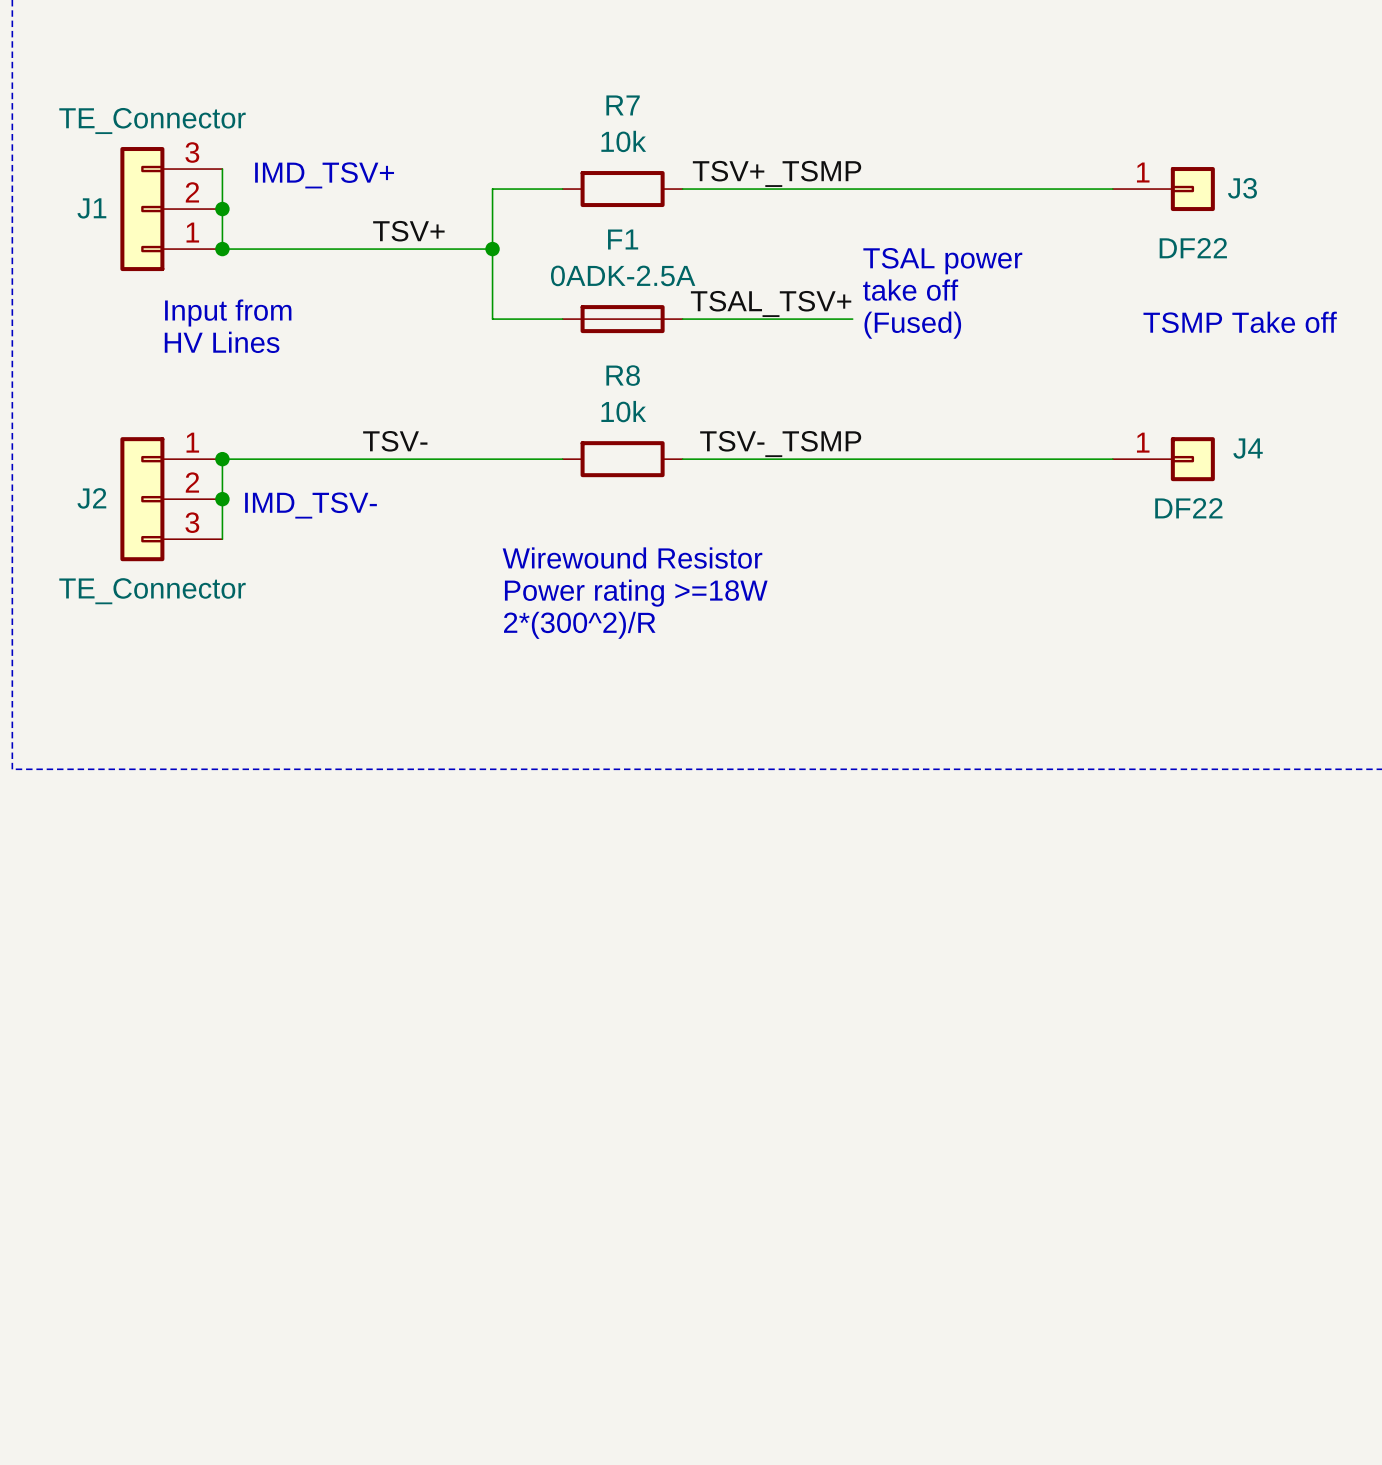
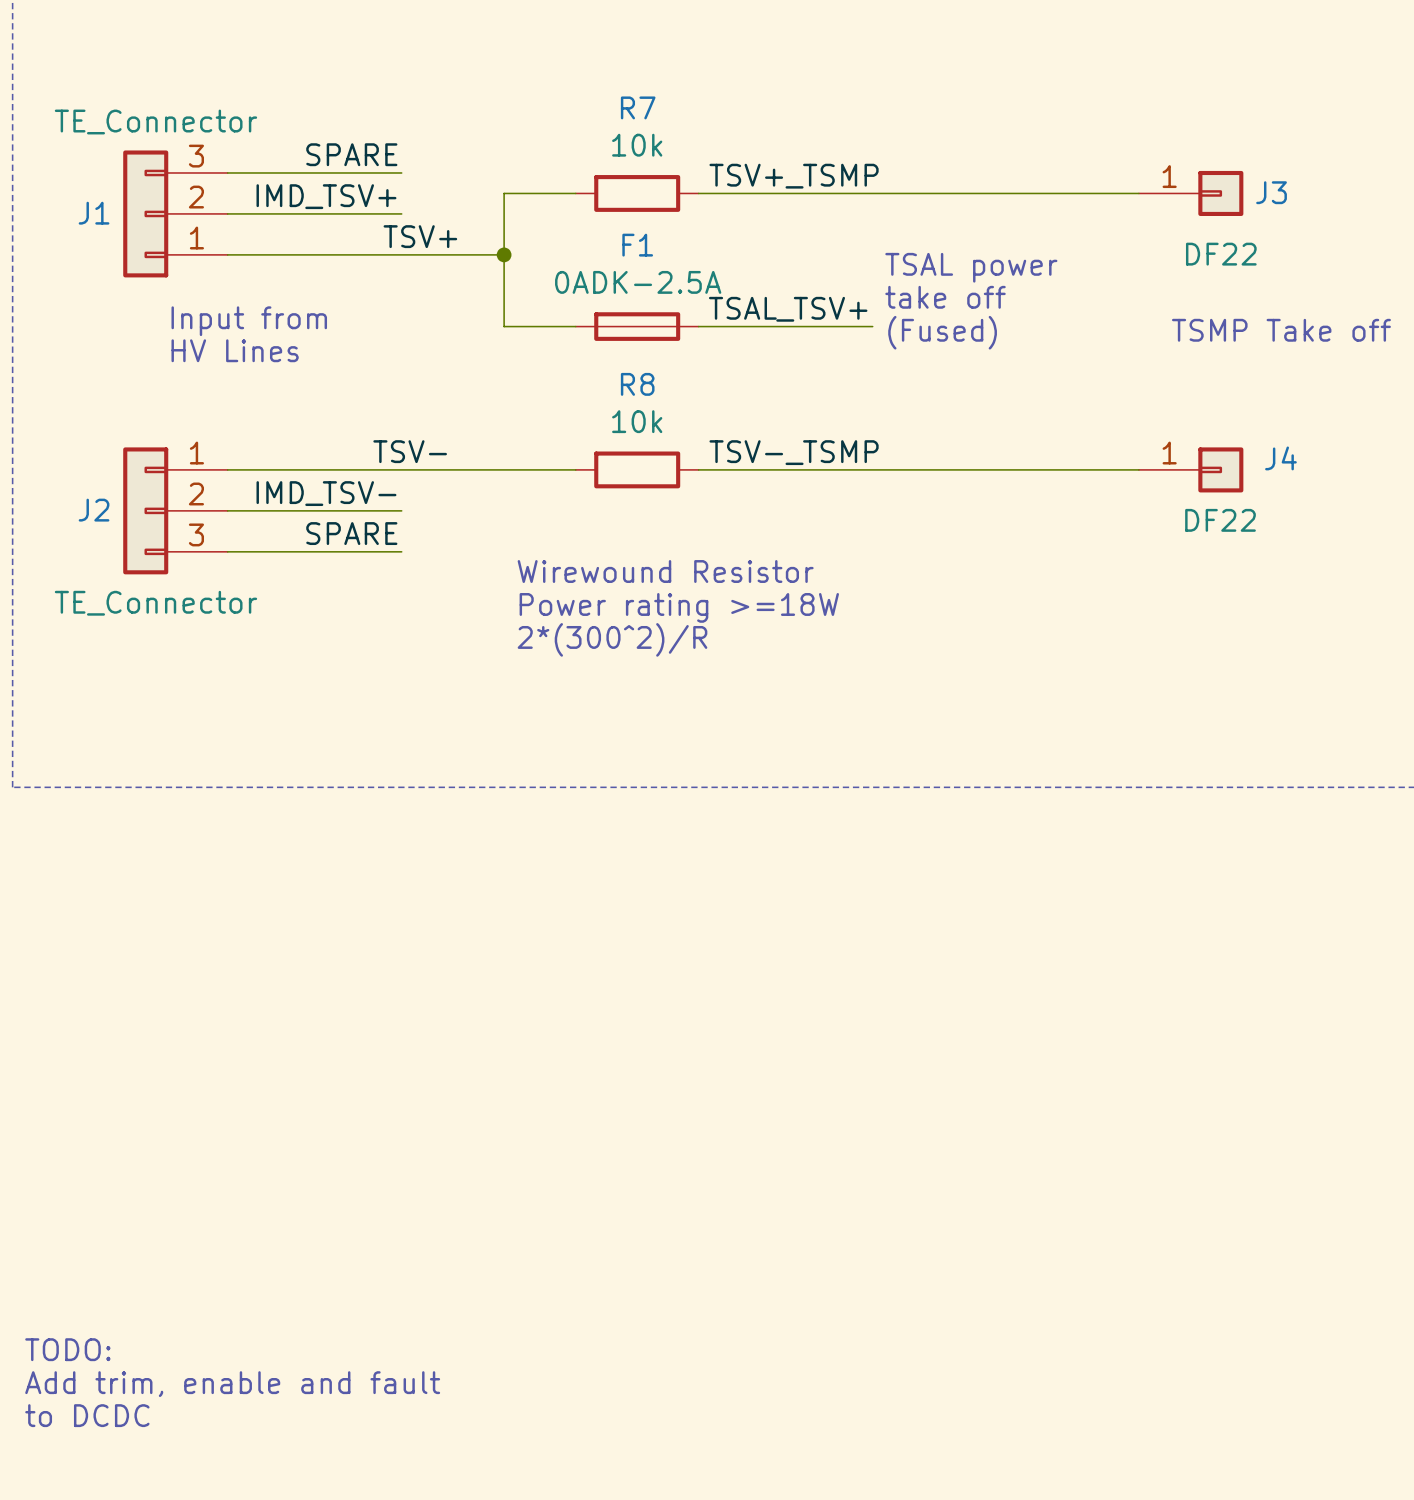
label: none -> SPARE (351, 154)
wire: (222, 169) (222, 249) -> (227, 172) (401, 172)
text: IMD_TSV+ (324, 175) -> none
label: none -> IMD_TSV+ (326, 196)
wire: none -> (227, 213) (401, 213)
junction: (222, 209) -> none
junction: (222, 249) -> none
wire: (222, 459) (222, 539) -> (401, 551) (227, 551)
junction: (222, 459) -> none
label: none -> IMD_TSV- (326, 493)
wire: none -> (227, 510) (401, 510)
junction: (222, 499) -> none
text: IMD_TSV- (311, 505) -> none
label: none -> SPARE (351, 533)
text: none -> TODO: (67, 1349)
text: none -> Add trim, enable and fault (232, 1384)
text: none -> to DCDC (87, 1415)

